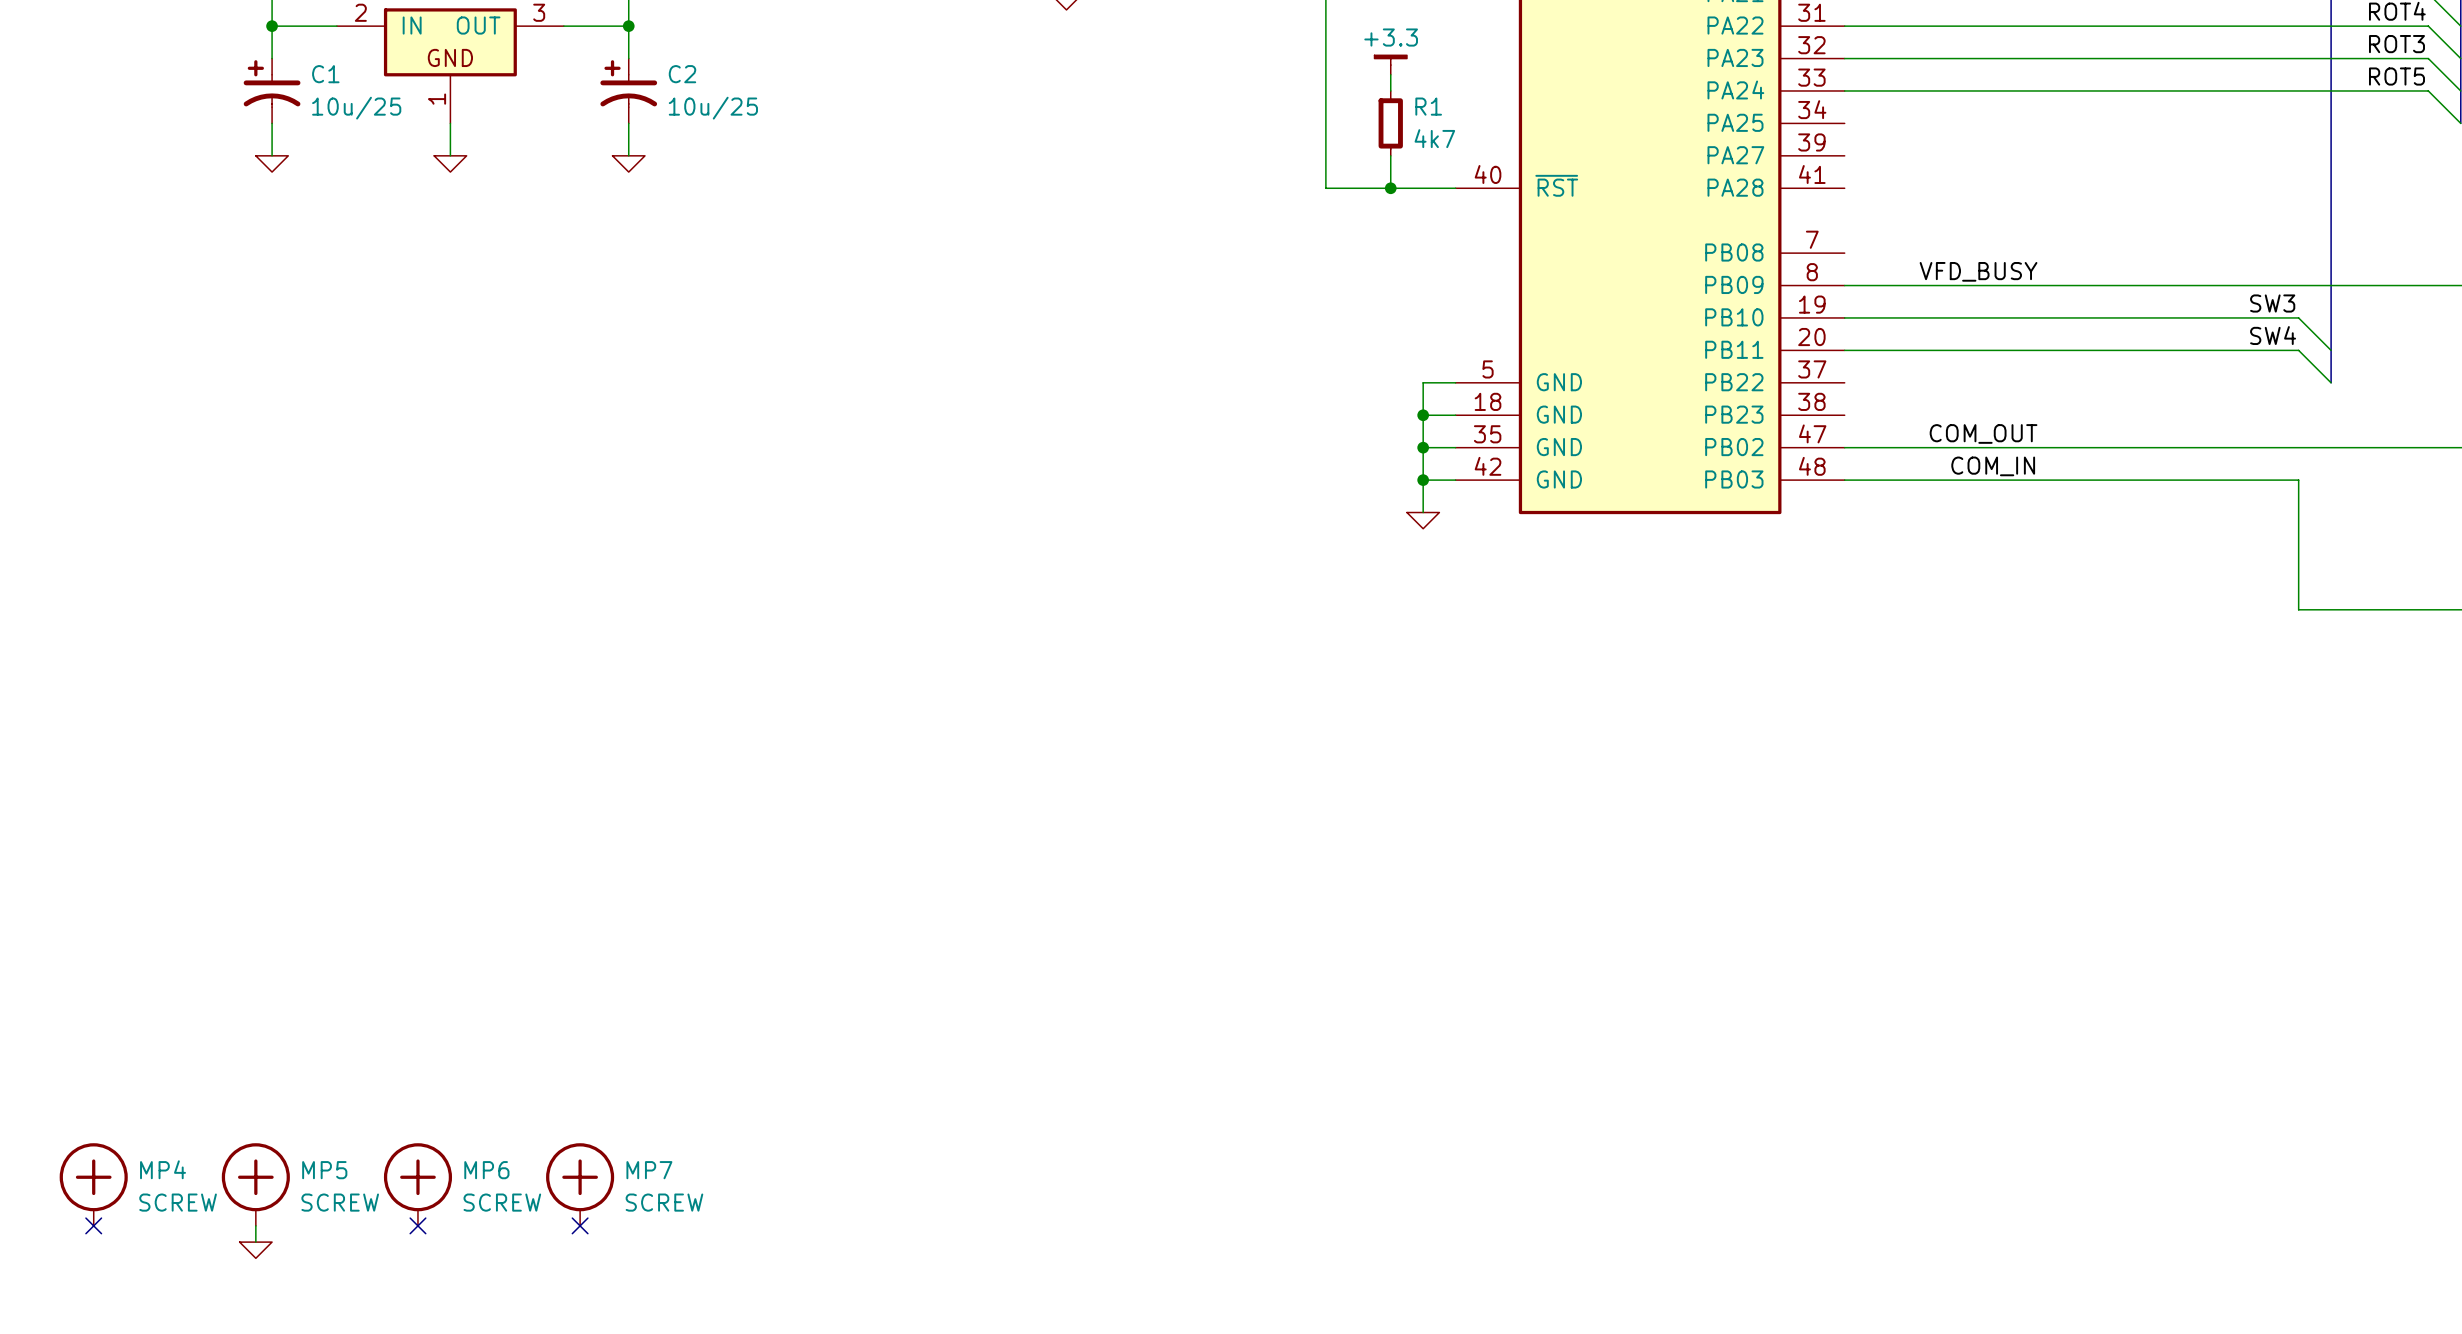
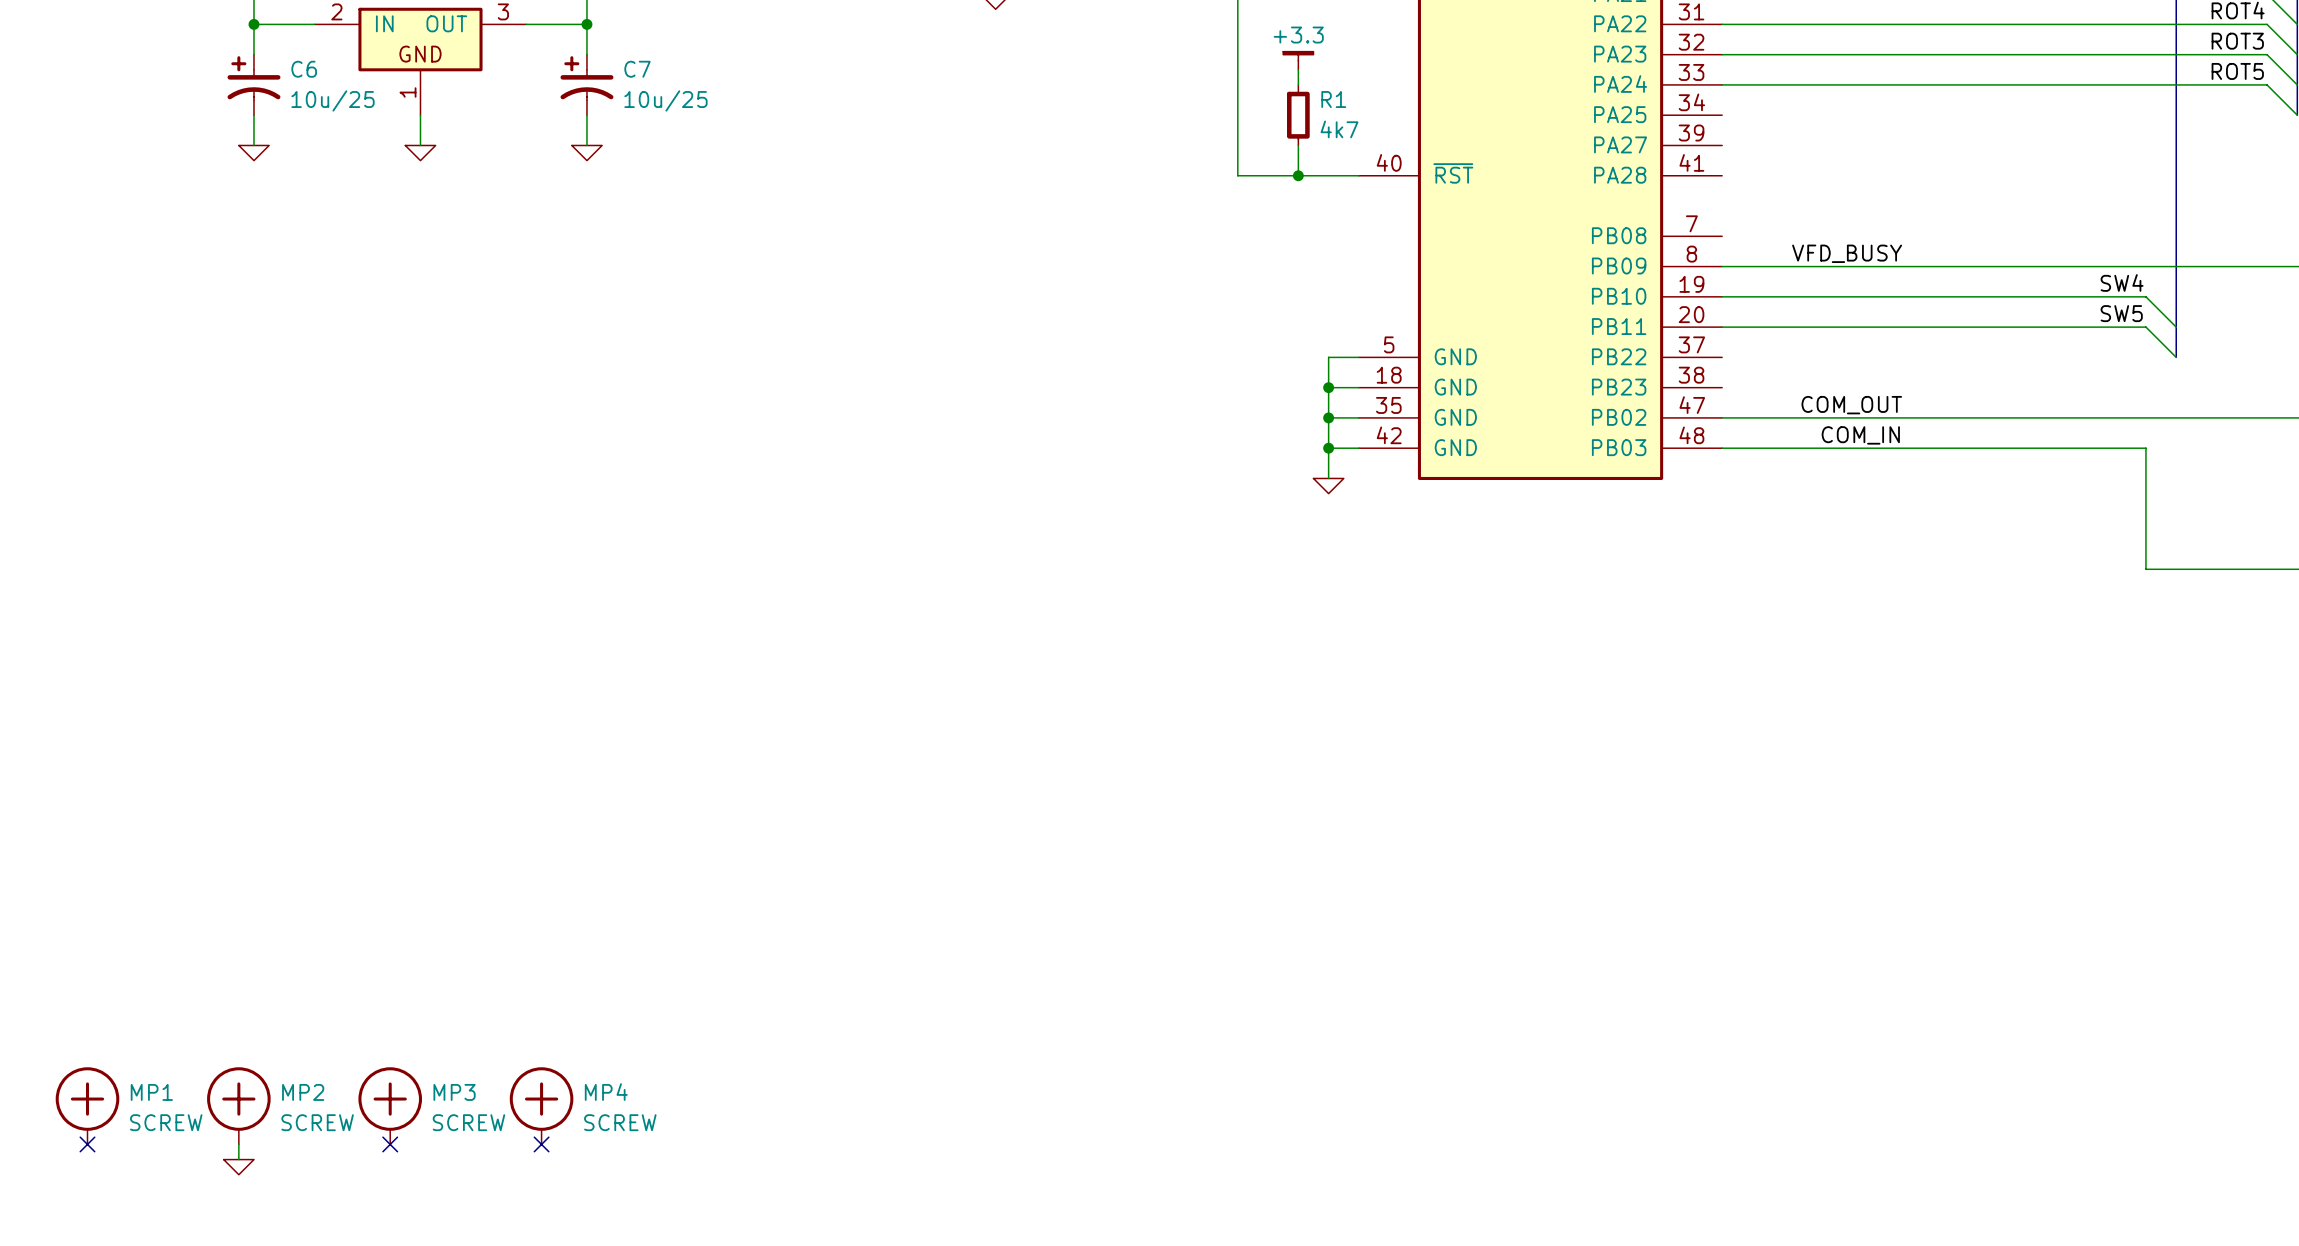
C1 name: C1 (325, 74) -> C6 (304, 69)
C2 name: C2 (682, 74) -> C7 (637, 69)
label: SW3 (2272, 303) -> SW4 (2122, 282)
label: SW4 (2273, 335) -> SW5 (2121, 313)
MP4 name: MP4 (163, 1169) -> MP1 (151, 1092)
MP5 name: MP5 (324, 1170) -> MP2 (303, 1092)
MP6 name: MP6 (486, 1170) -> MP3 (454, 1092)
MP7 name: MP7 (649, 1170) -> MP4 (606, 1092)

